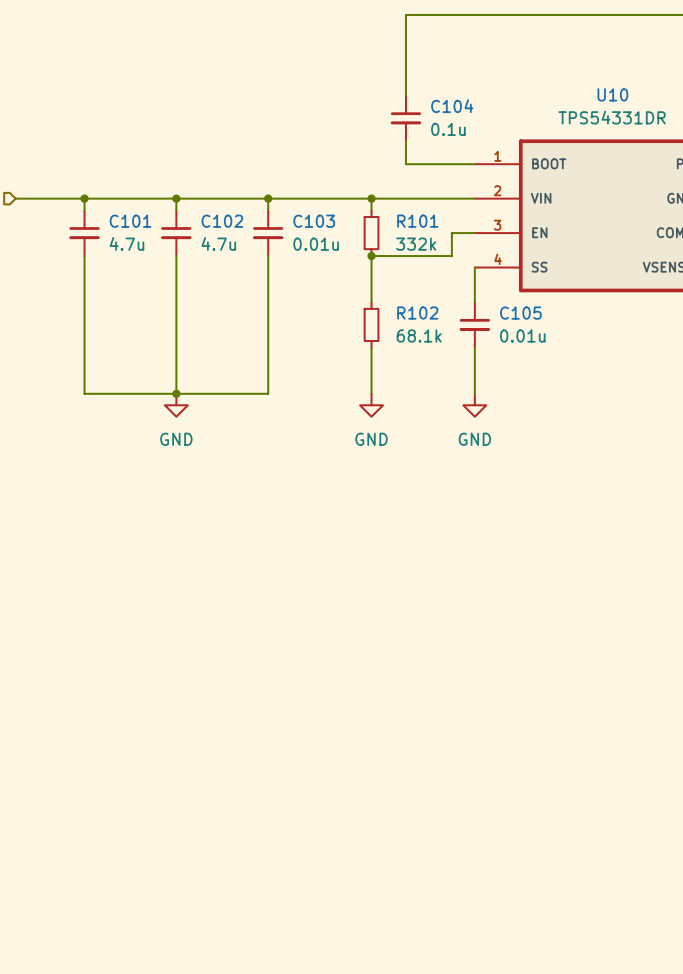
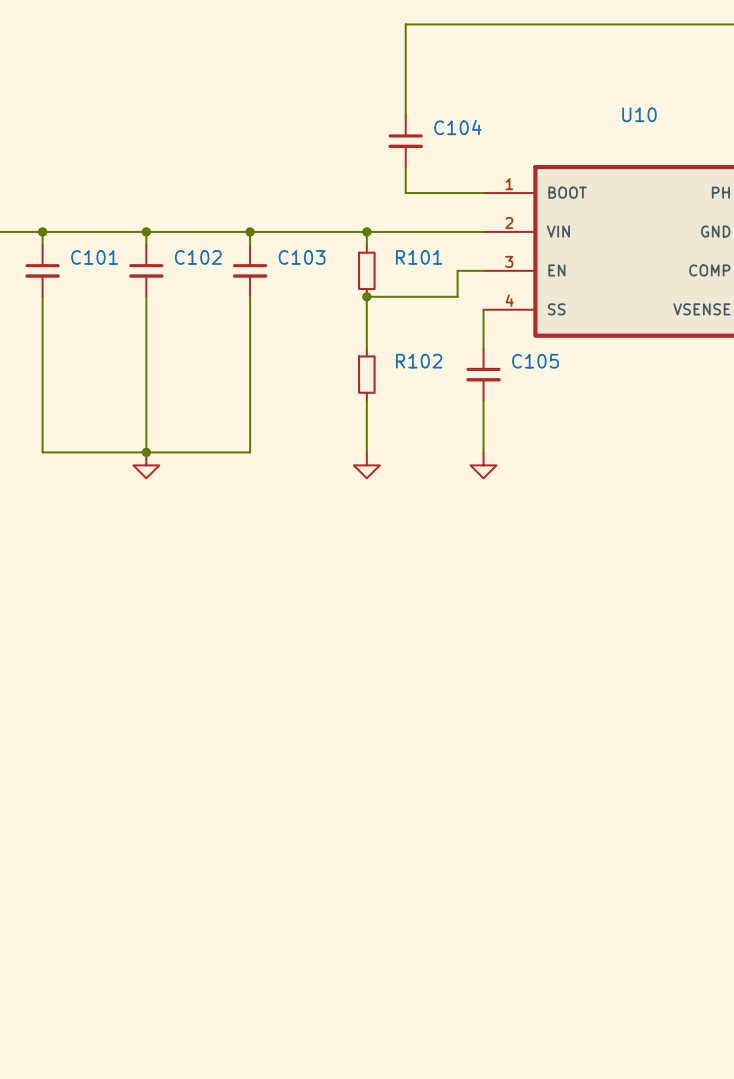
U10 value: TPS54331DR (612, 117) -> none
C104 value: 0.1u (448, 129) -> none
C101 value: 4.7u (126, 243) -> none
C102 value: 4.7u (218, 243) -> none
C103 value: 0.01u (316, 244) -> none
R101 value: 332k (416, 244) -> none
R102 value: 68.1k (419, 335) -> none
C105 value: 0.01u (522, 336) -> none
power symbol text: GND (176, 439) -> none
power symbol text: GND (371, 439) -> none
power symbol text: GND (474, 439) -> none

